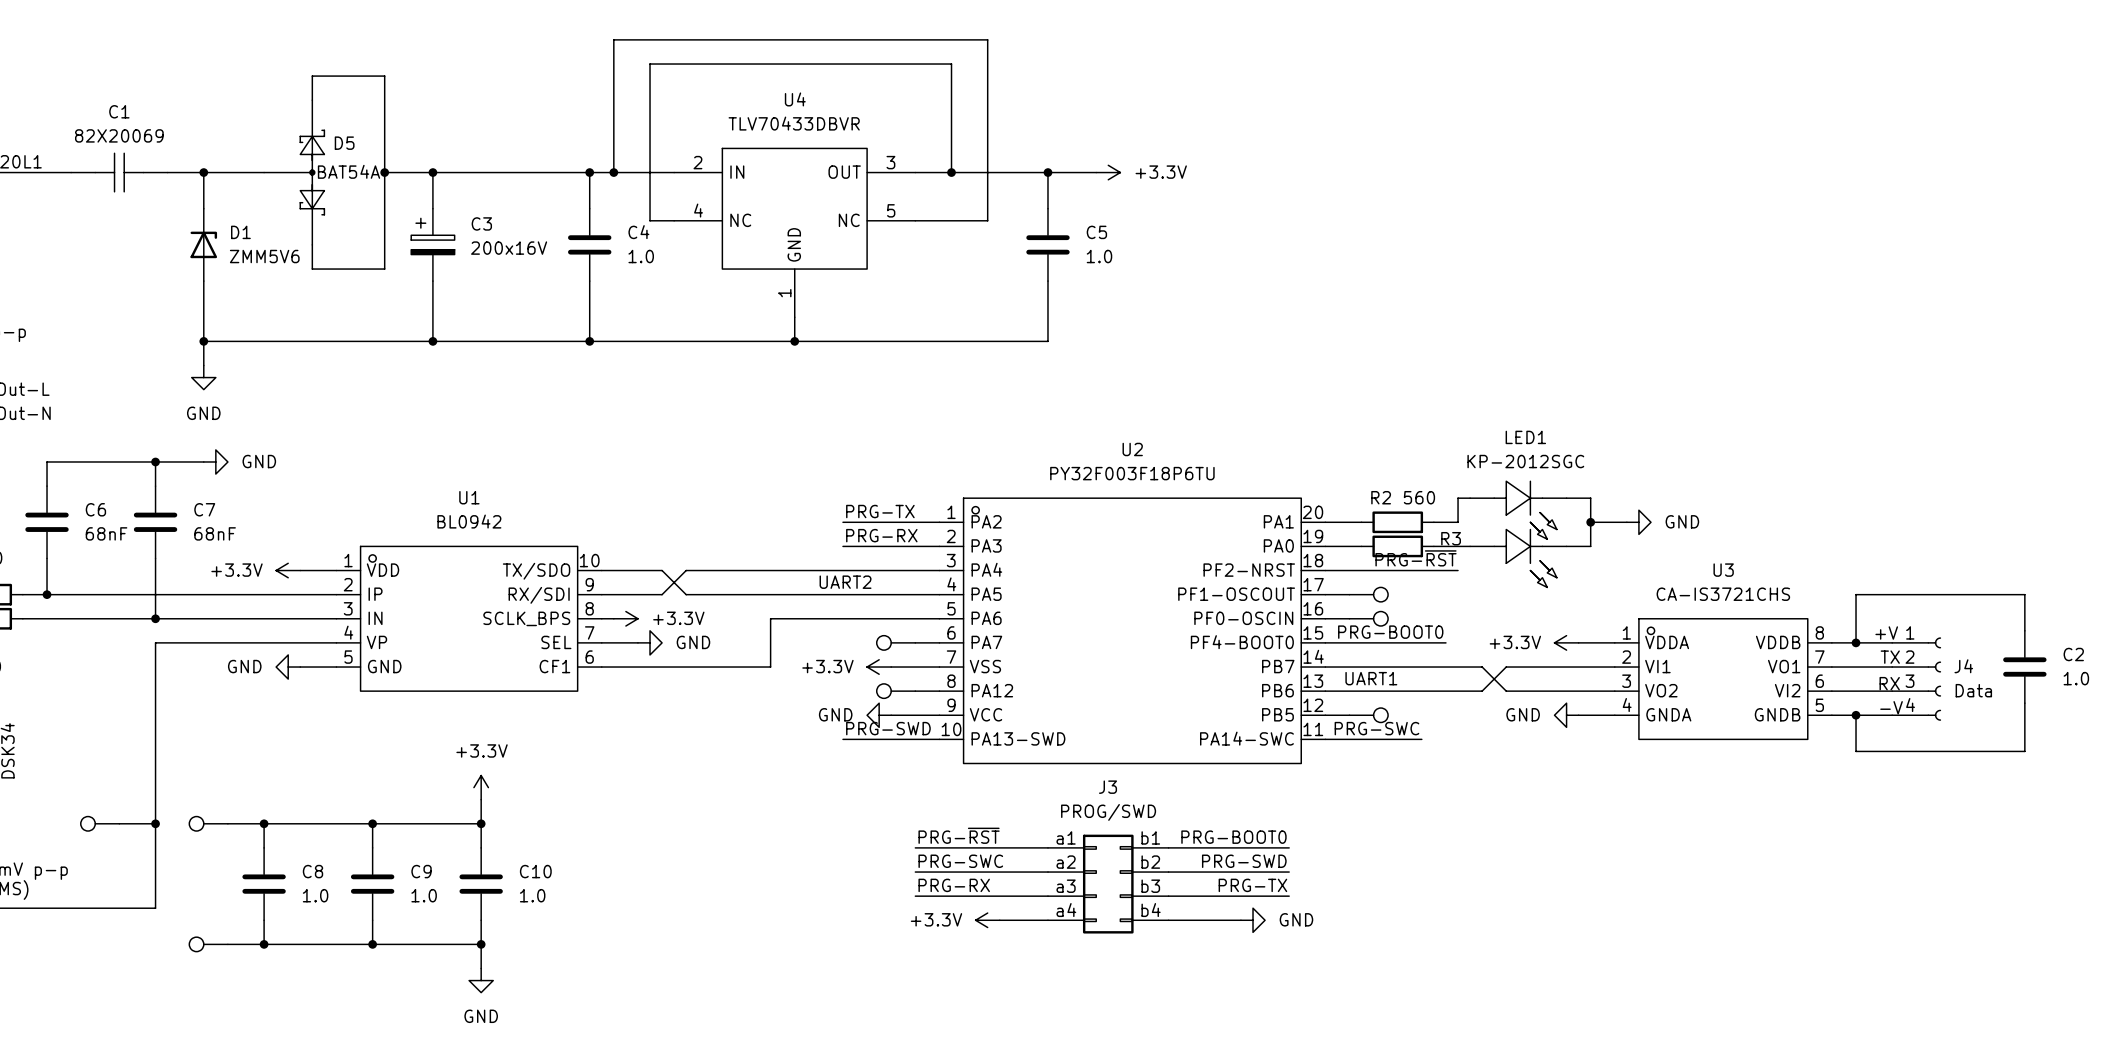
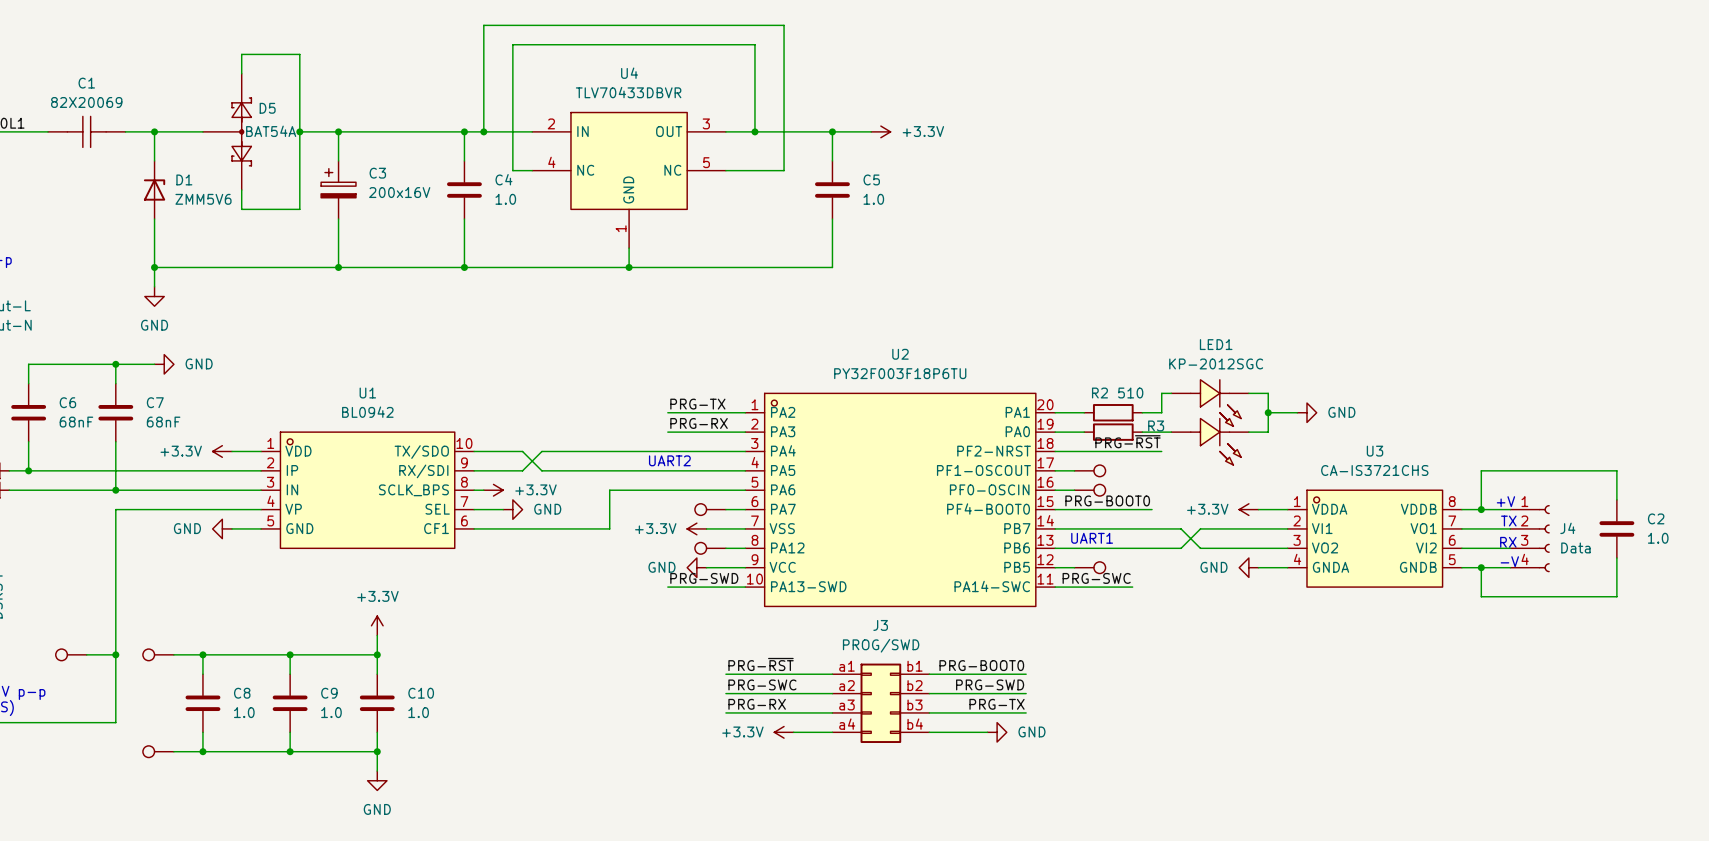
R2 value: 560 (1419, 497) -> 510 (1130, 393)

